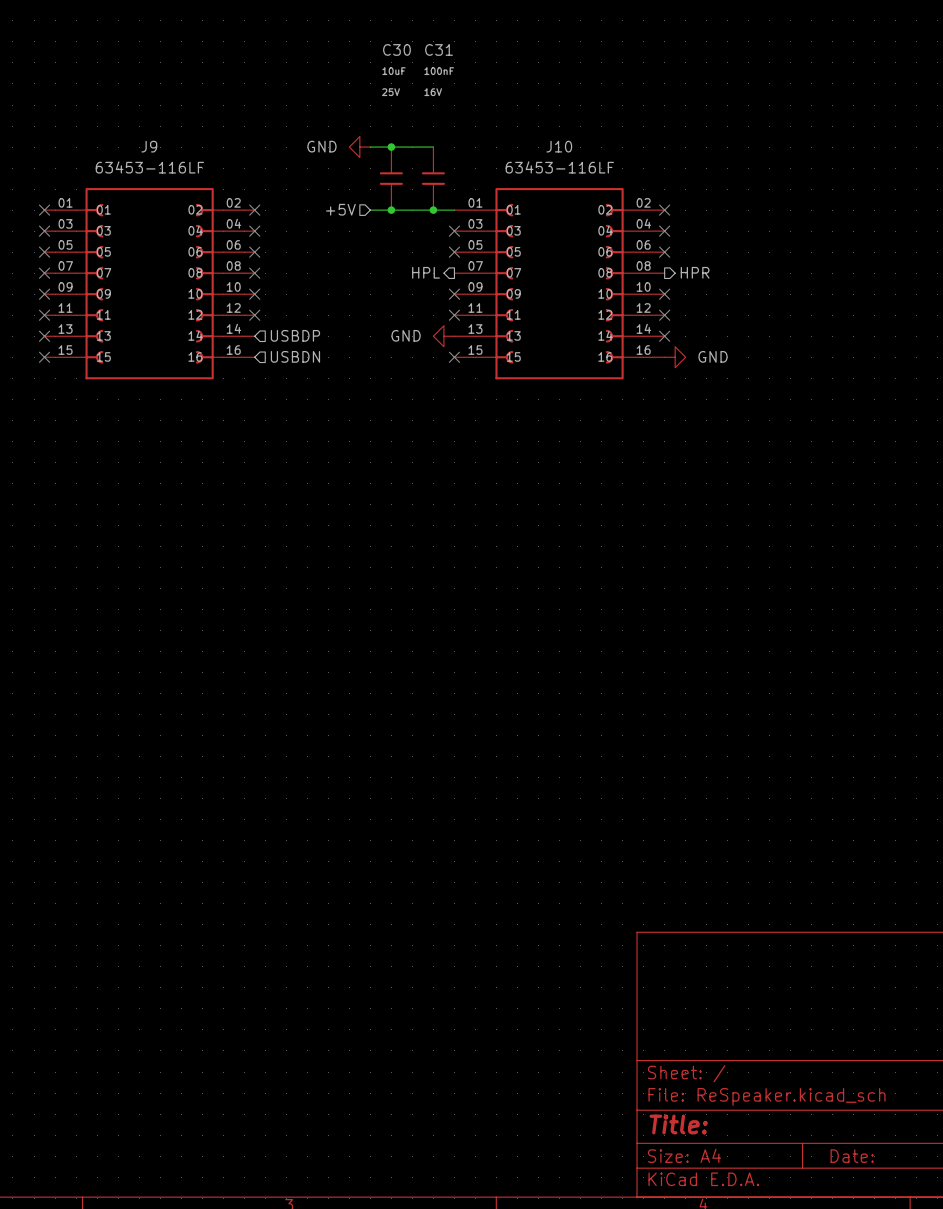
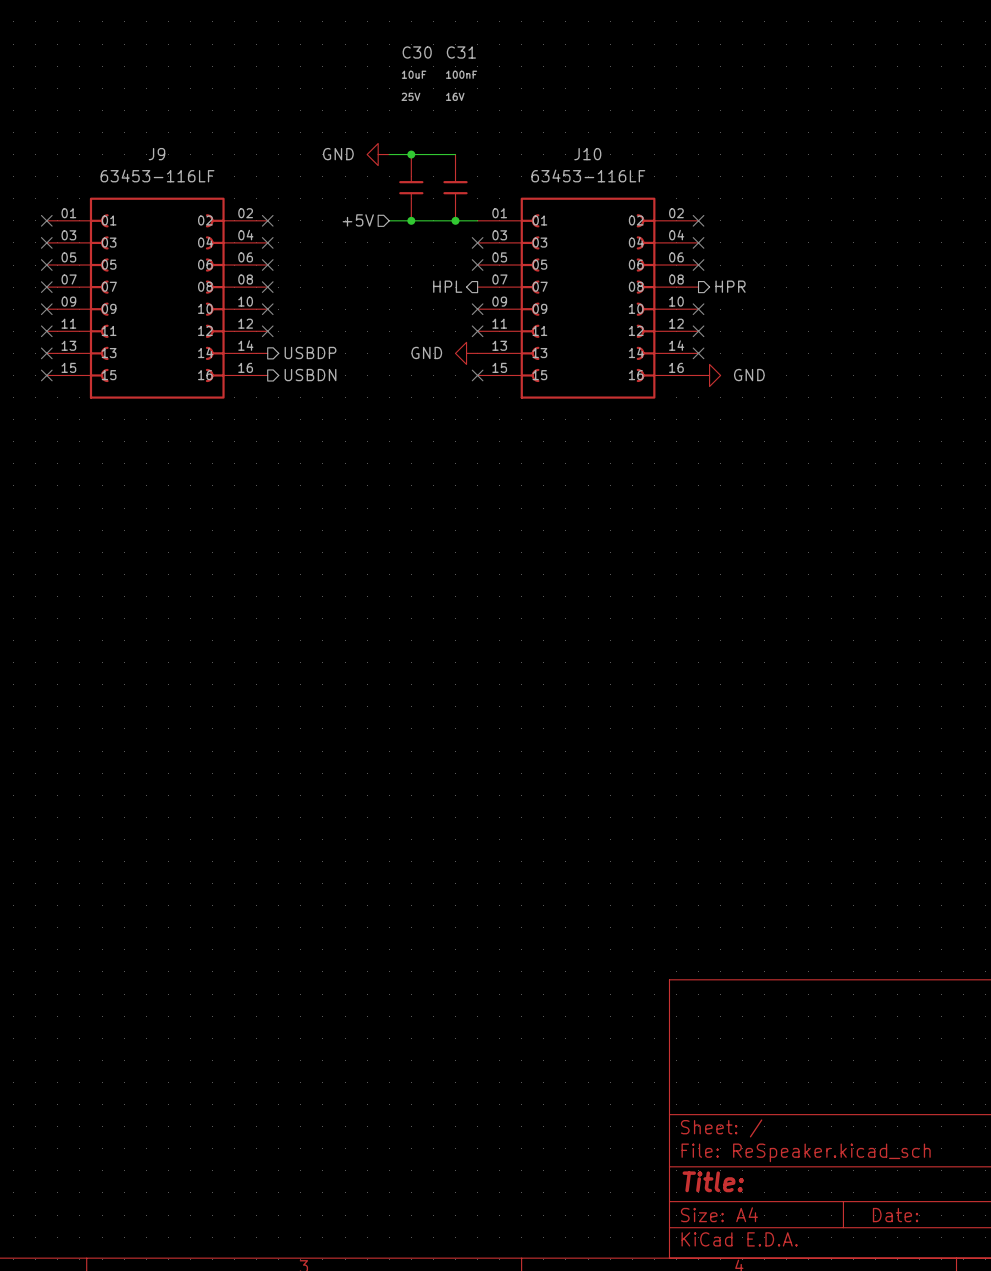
hierarchical label shape: input (295, 335) -> output (310, 352)
hierarchical label shape: input (295, 356) -> output (310, 375)

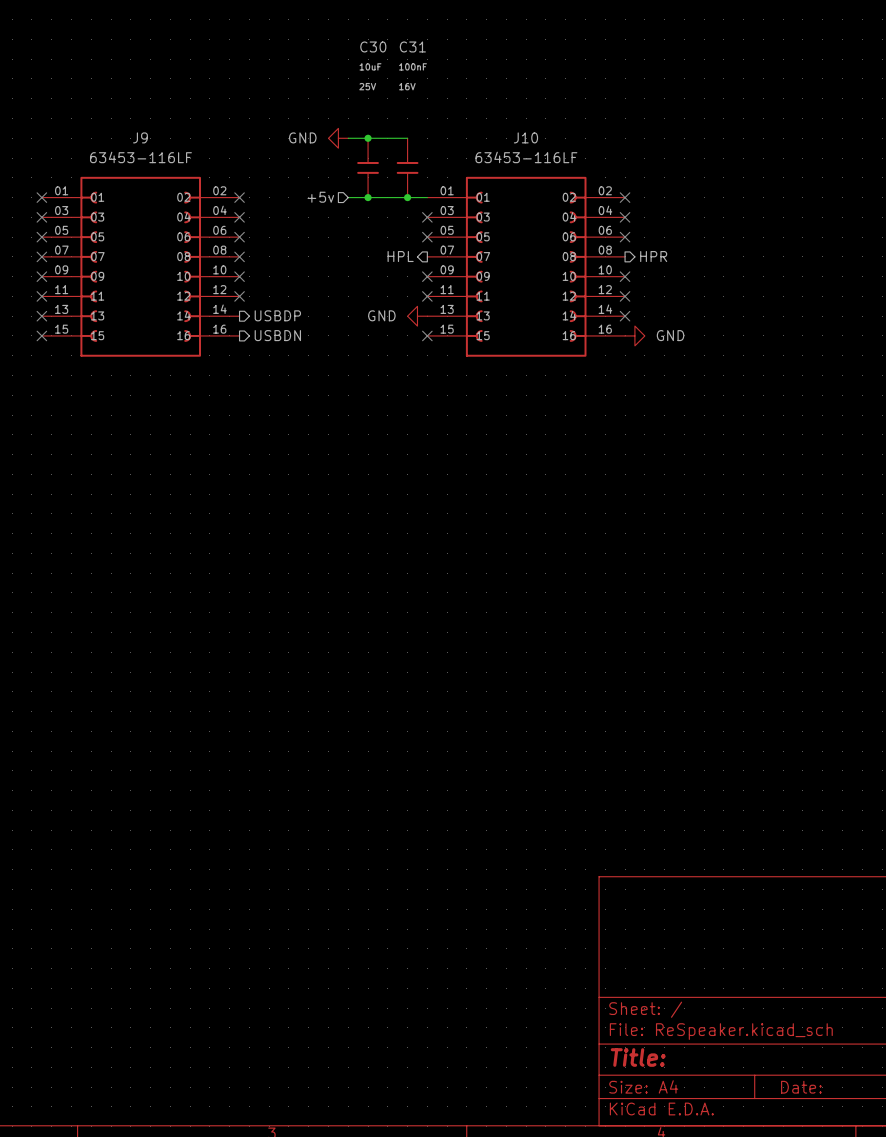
hierarchical label: +5V (358, 220) -> +5v (320, 197)

